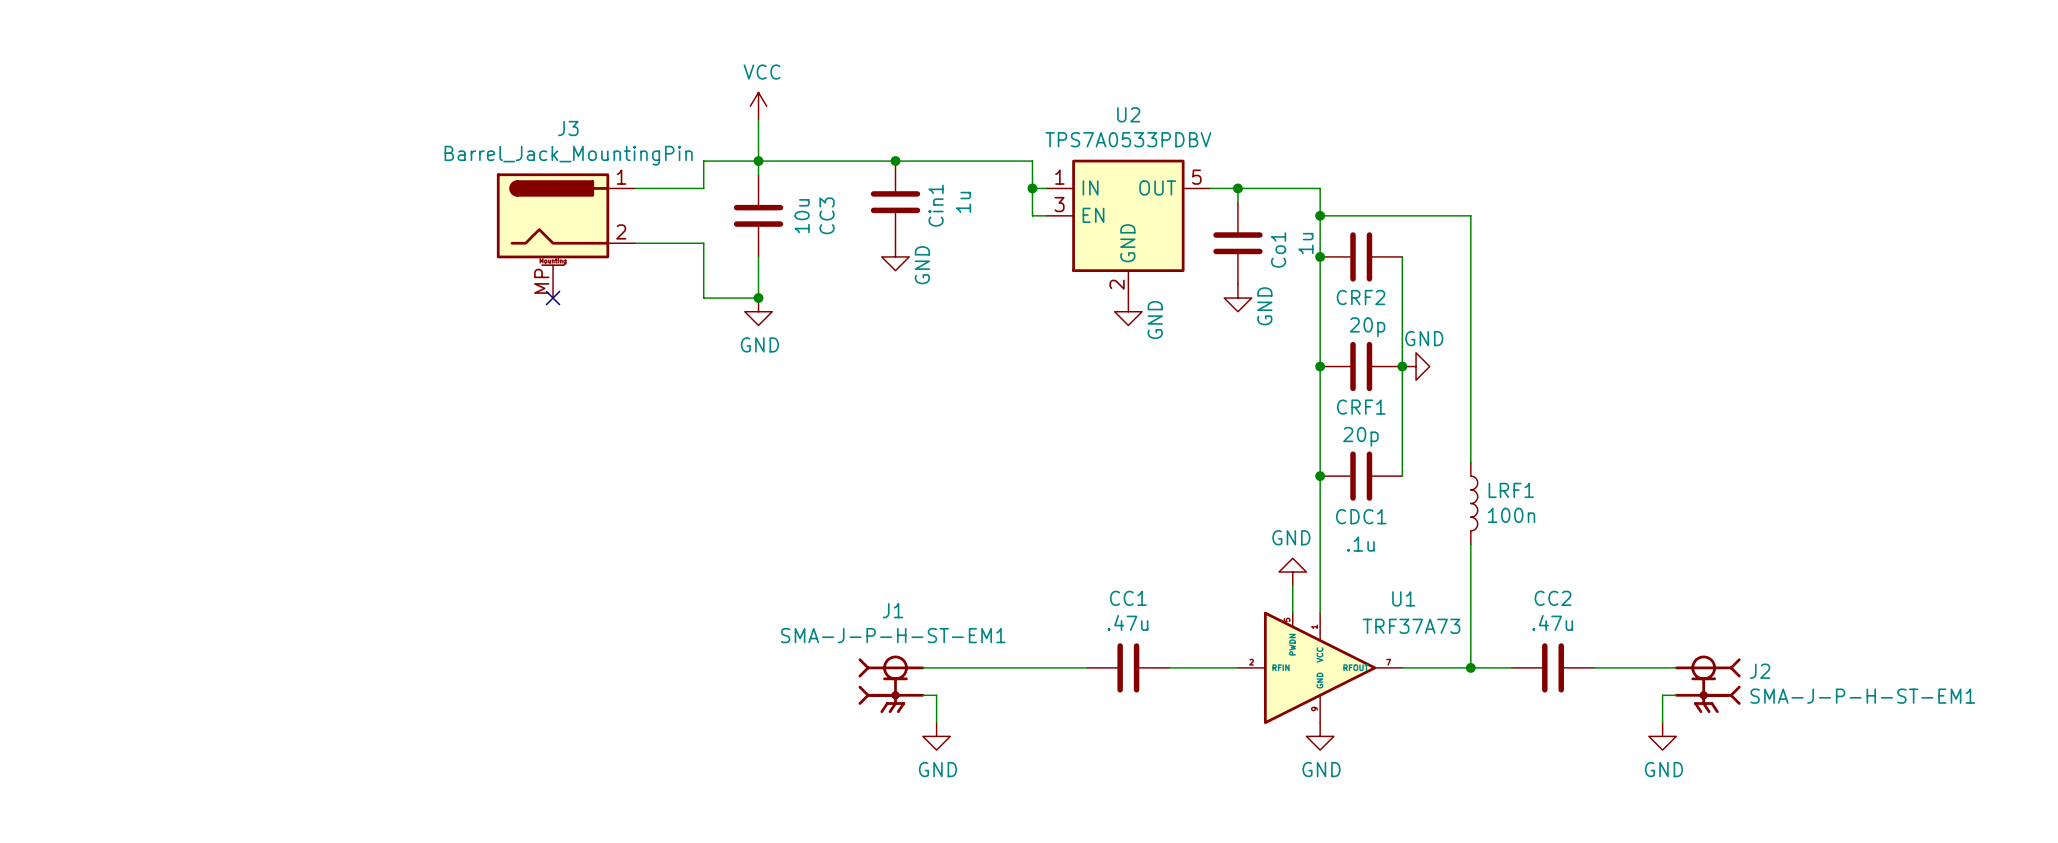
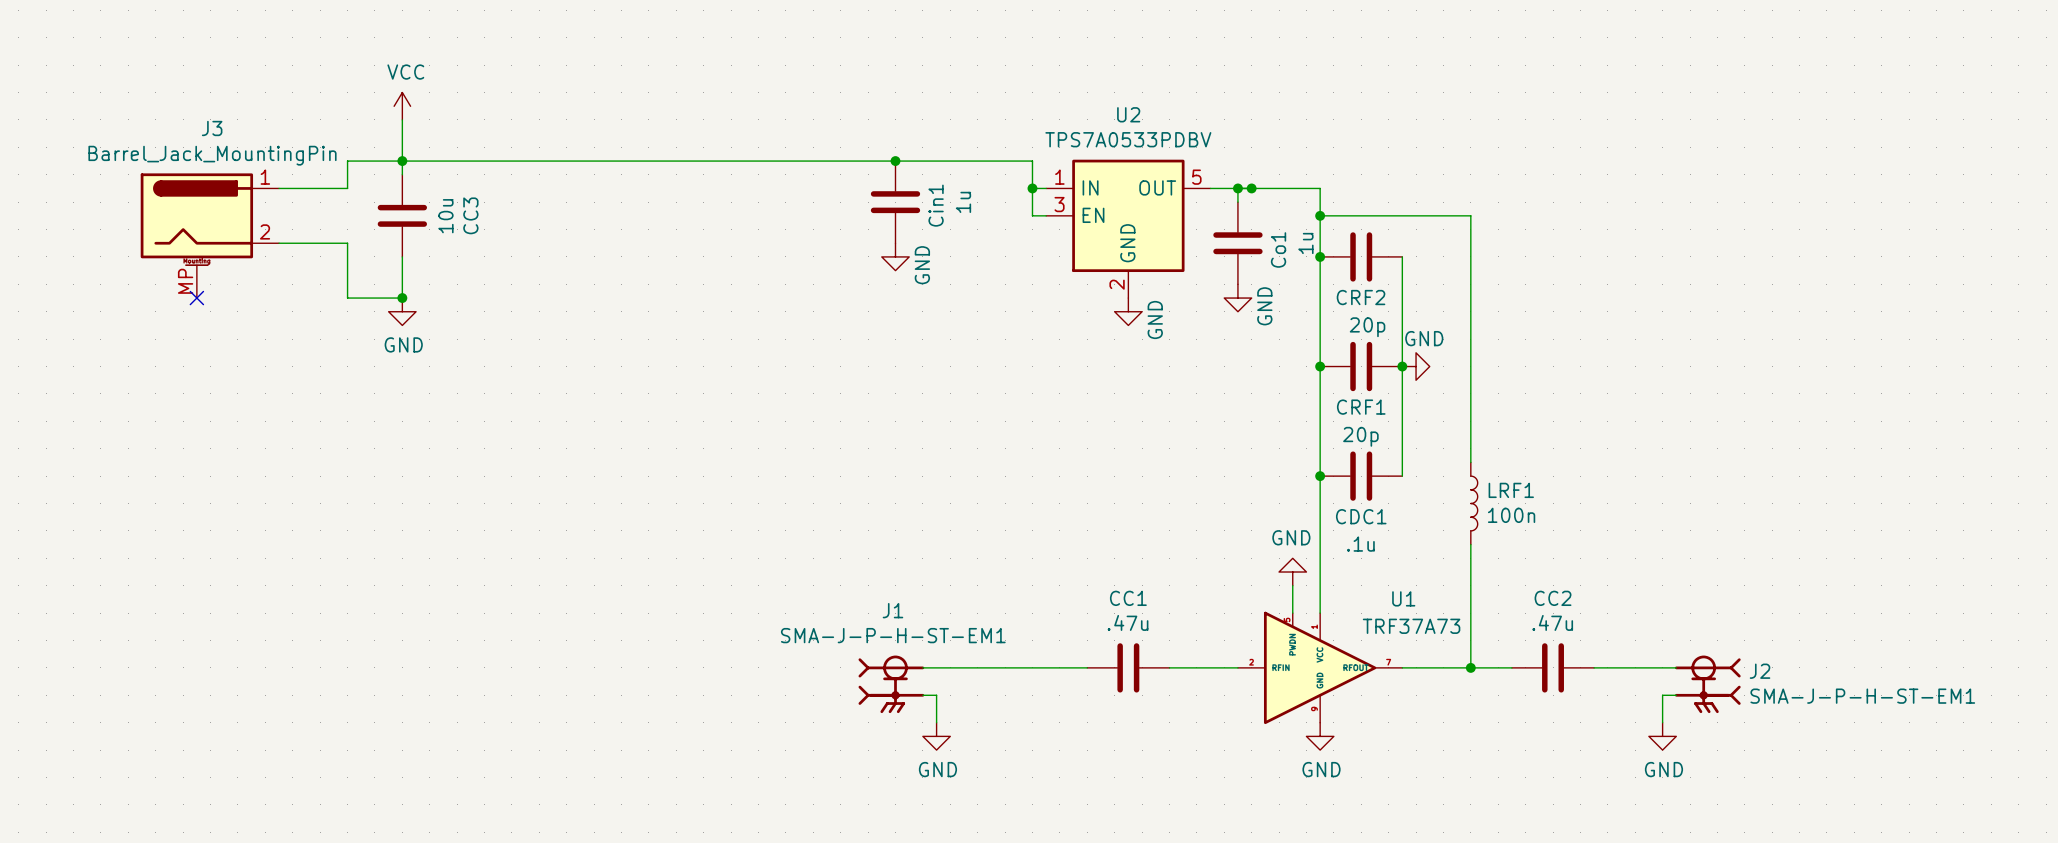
power symbol: none -> VCC (402, 106)
power symbol: VCC (758, 106) -> none
wire: none -> (402, 119) (402, 174)
wire: (758, 119) (758, 174) -> none
junction: none -> (402, 161)
wire: (703, 161) (703, 188) (635, 188) -> (703, 161) (347, 161) (347, 188) (279, 188)
junction: (758, 161) -> none
junction: none -> (1251, 188)
CC3 position: (758, 215) -> (402, 215)
J3 position: (566, 235) -> (209, 235)
wire: none -> (279, 243) (347, 243) (347, 298) (402, 298) (402, 256)
wire: (635, 243) (703, 243) (703, 298) (758, 298) (758, 256) -> none
no-connect mark: none -> (196, 298)
junction: none -> (402, 298)
no-connect mark: (553, 298) -> none
junction: (758, 298) -> none
power symbol: none -> GND (402, 311)
power symbol: GND (758, 311) -> none

